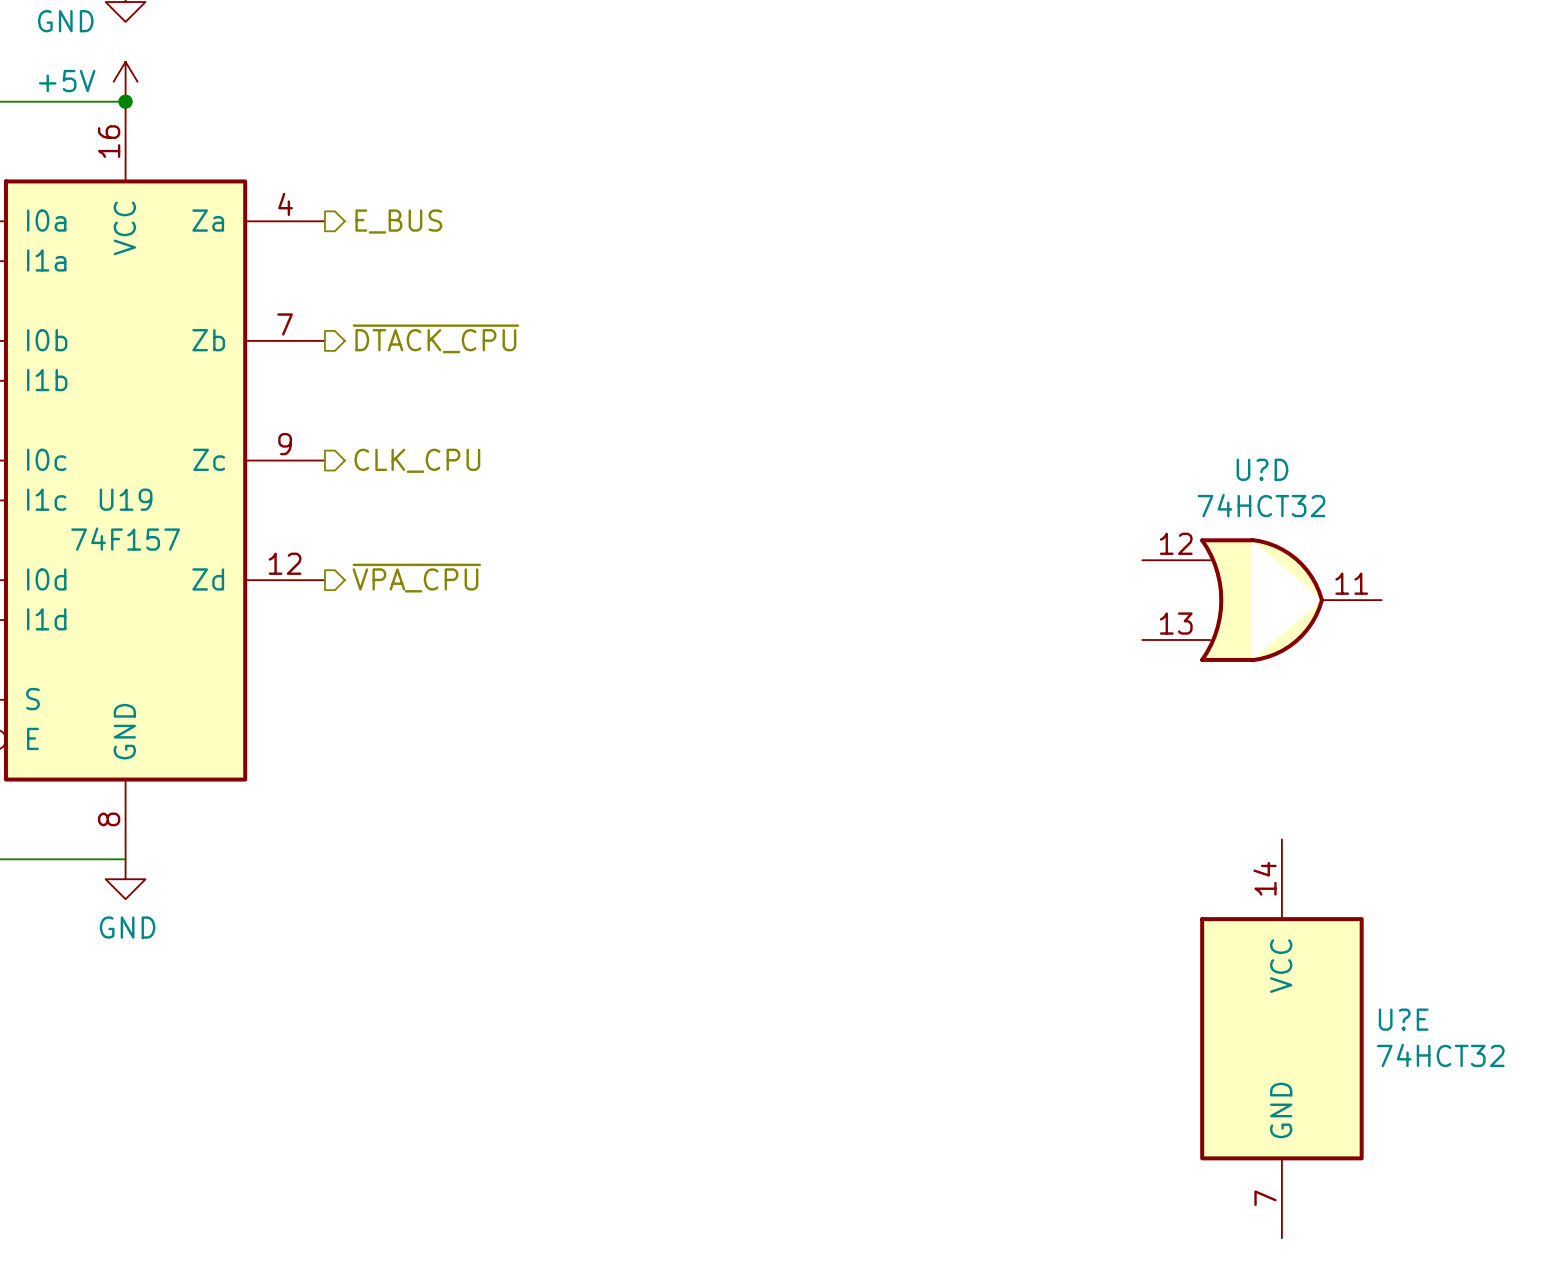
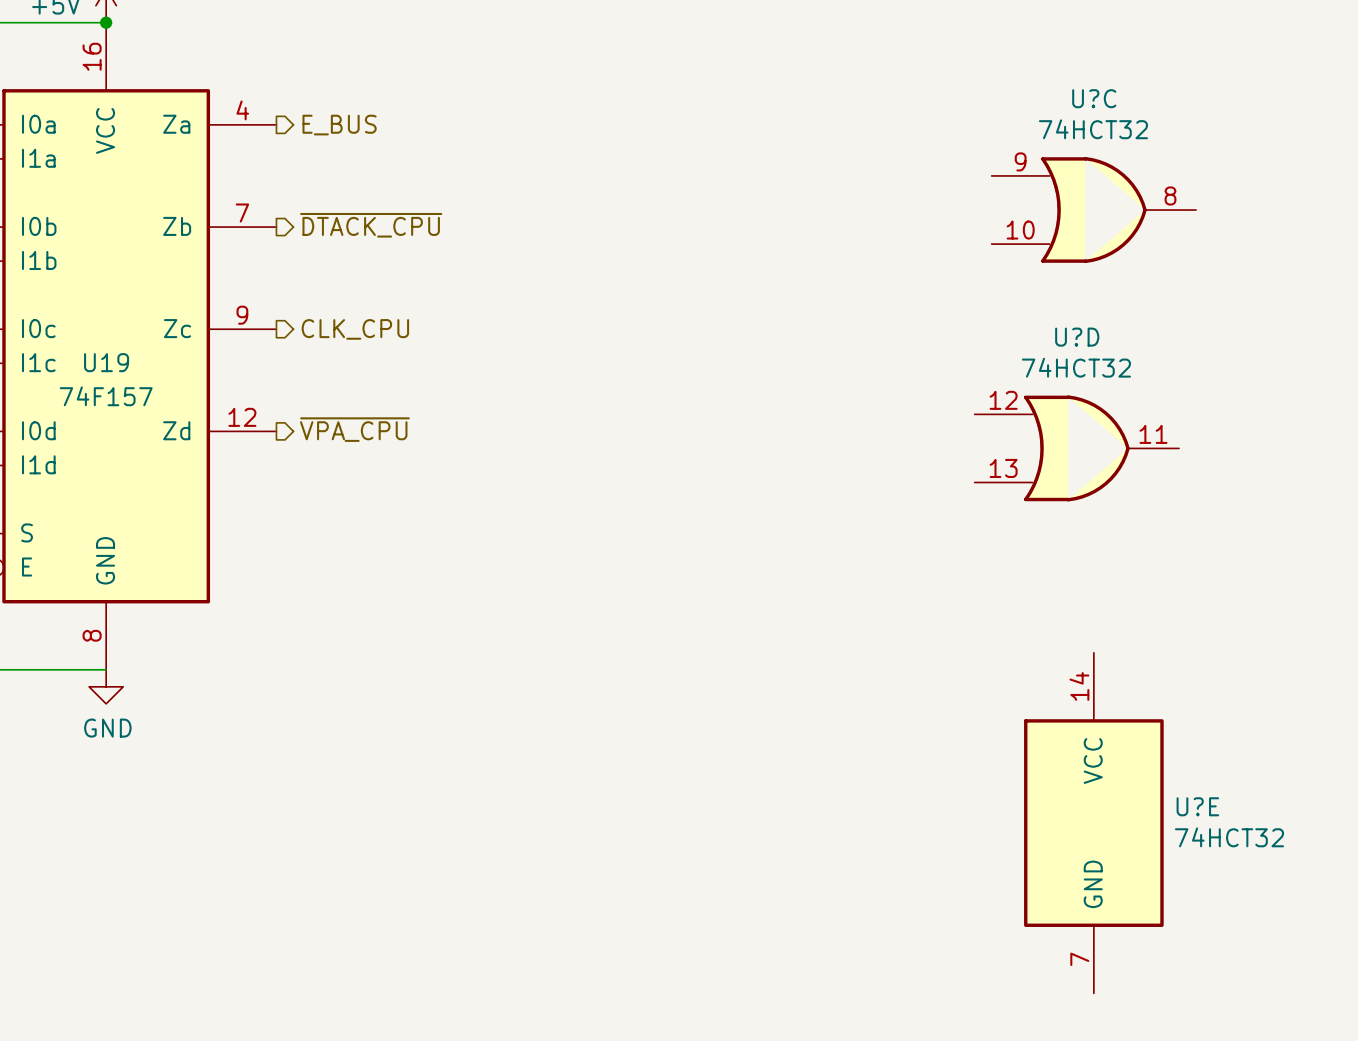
U?C: none -> 74HCT32 (1093, 210)

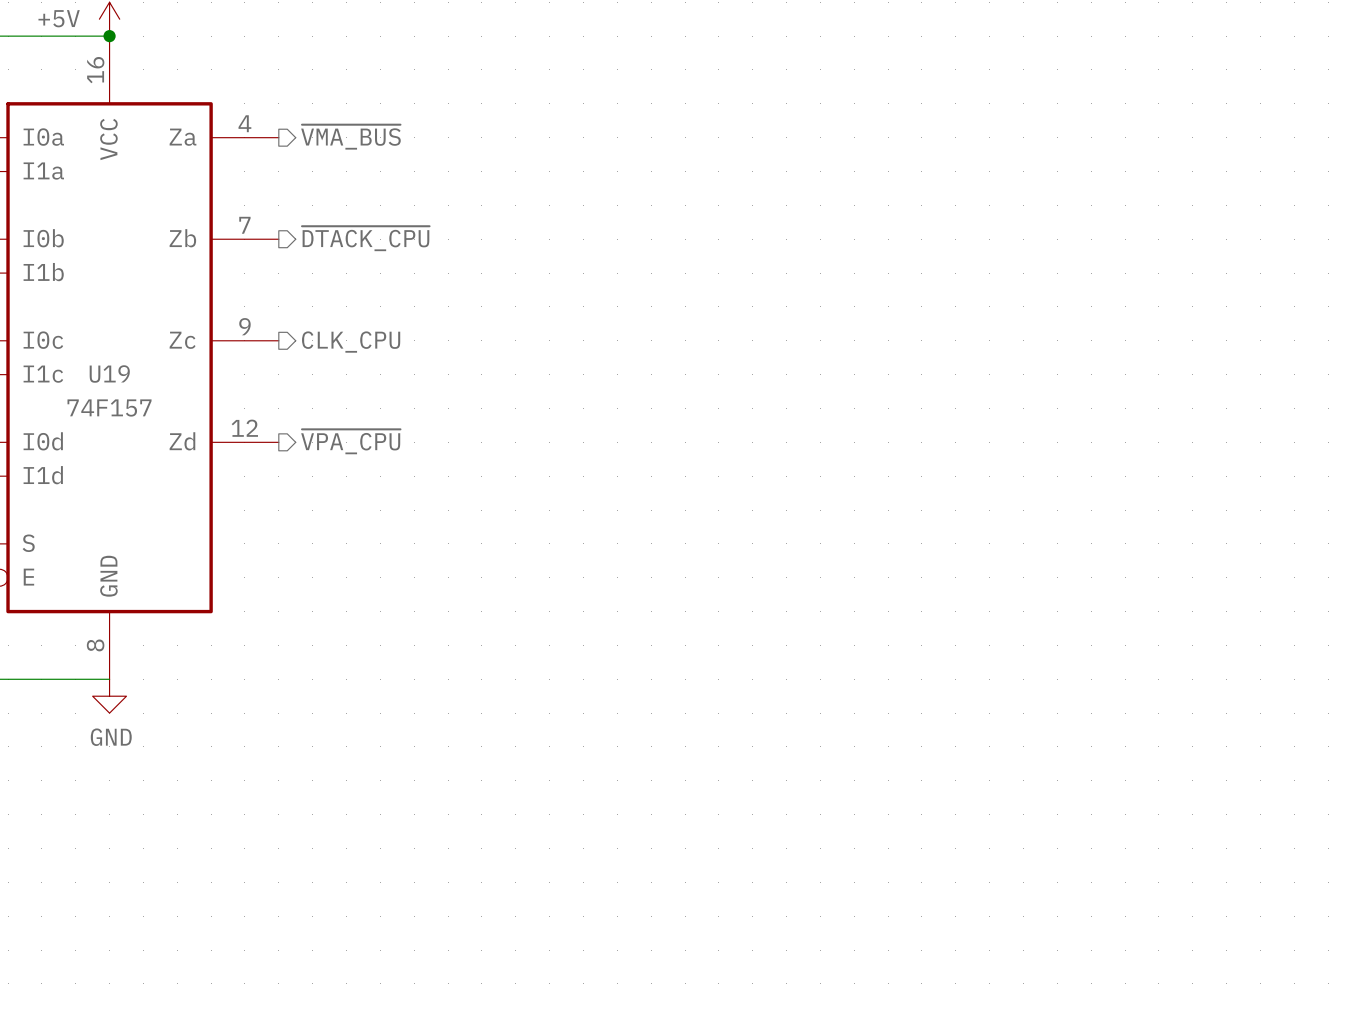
hierarchical label: E_BUS (339, 125) -> ~{VMA_BUS} (350, 137)
U?C: 74HCT32 (1093, 210) -> none
U?D: 74HCT32 (1076, 448) -> none
U?E: 74HCT32 (1093, 823) -> none

